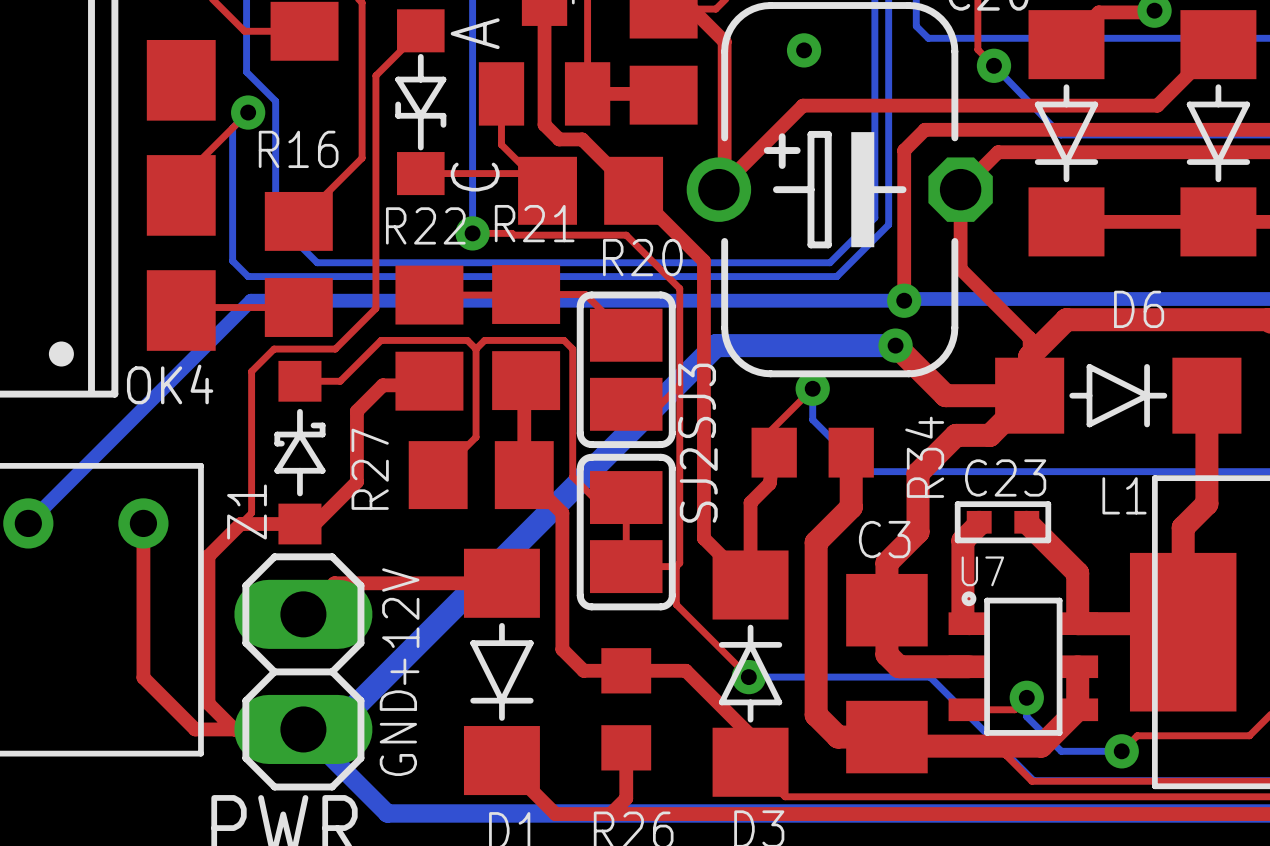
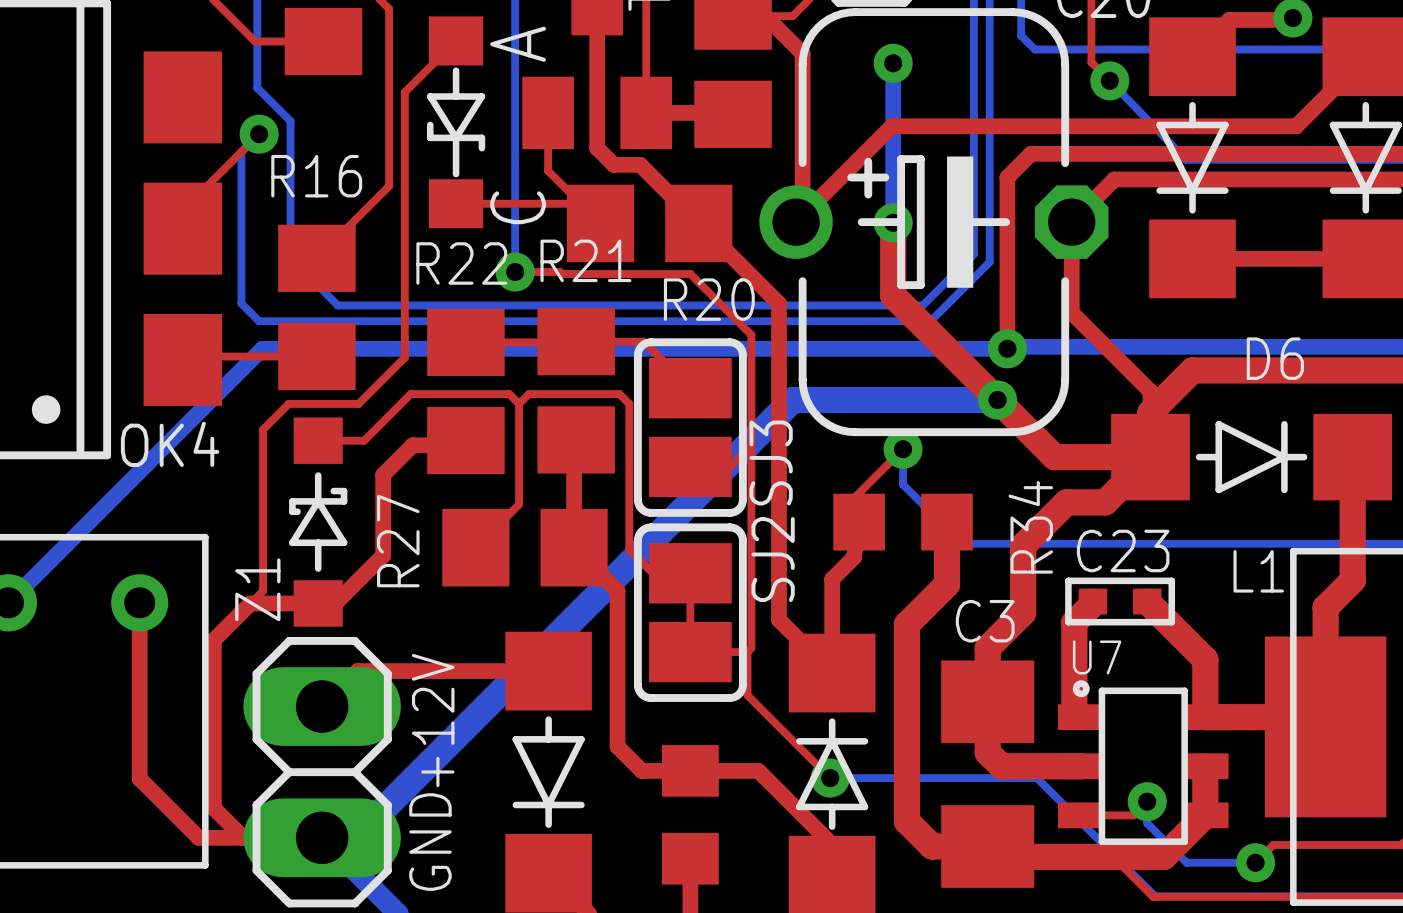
bottom track: none -> (893, 63) (893, 222)
top track: none -> (893, 222) (893, 295) (997, 400)
via: none -> (893, 222)

